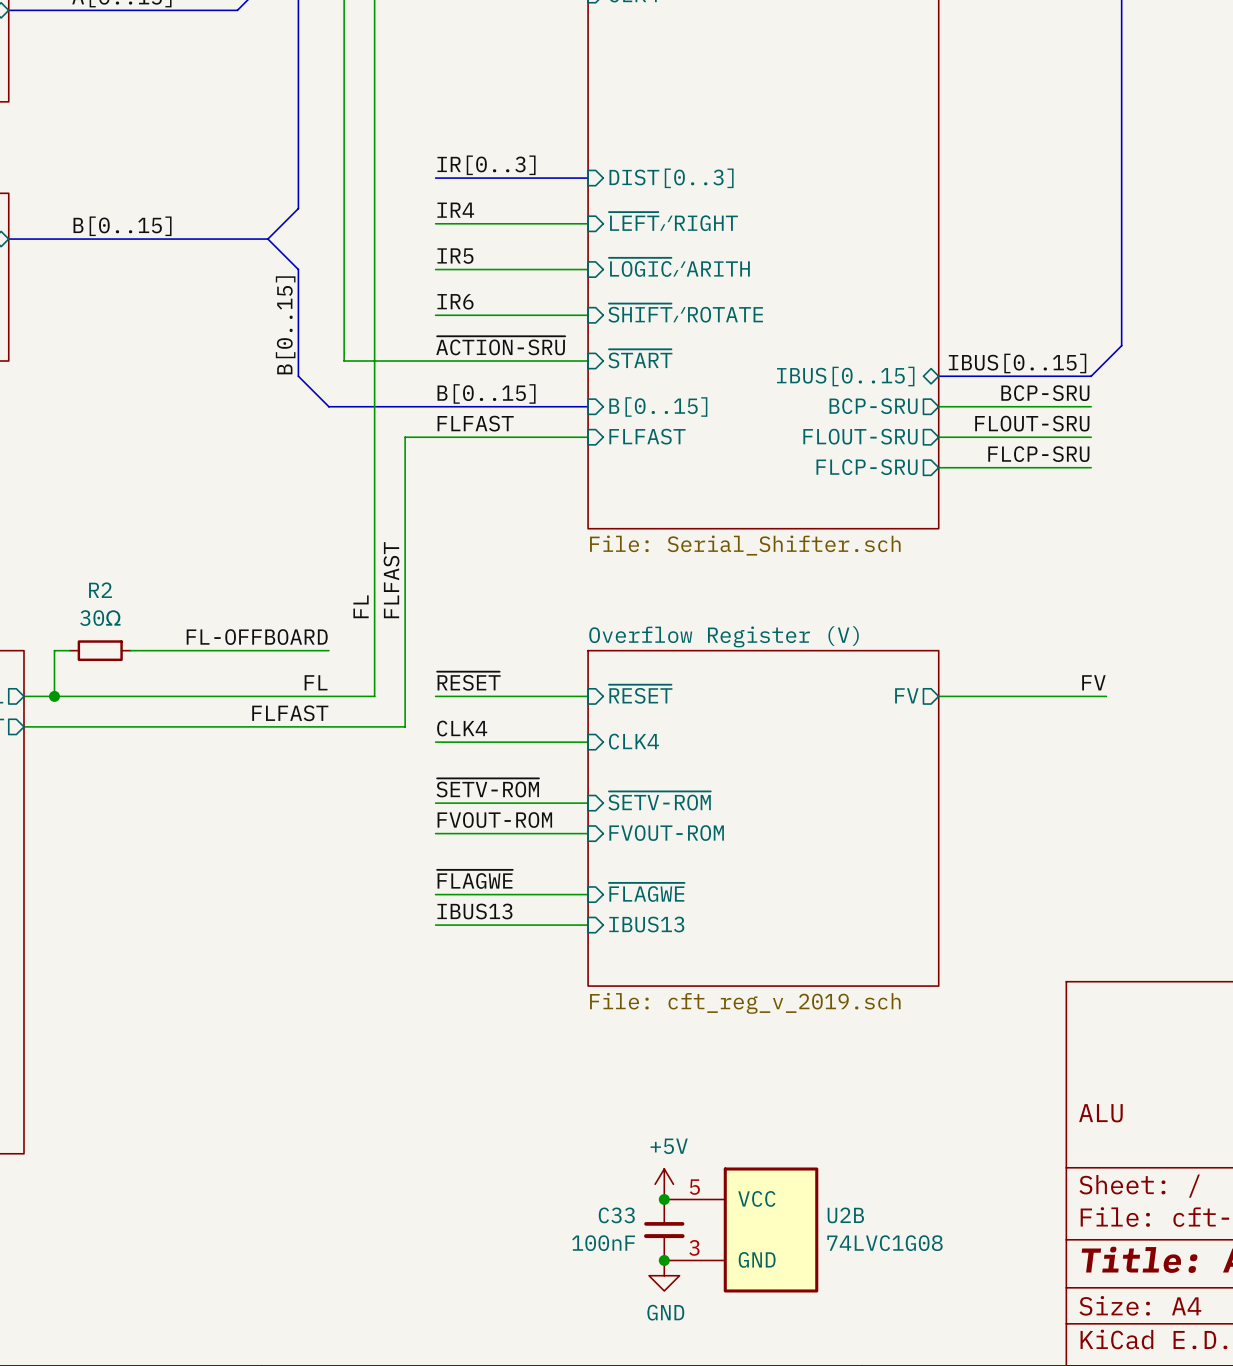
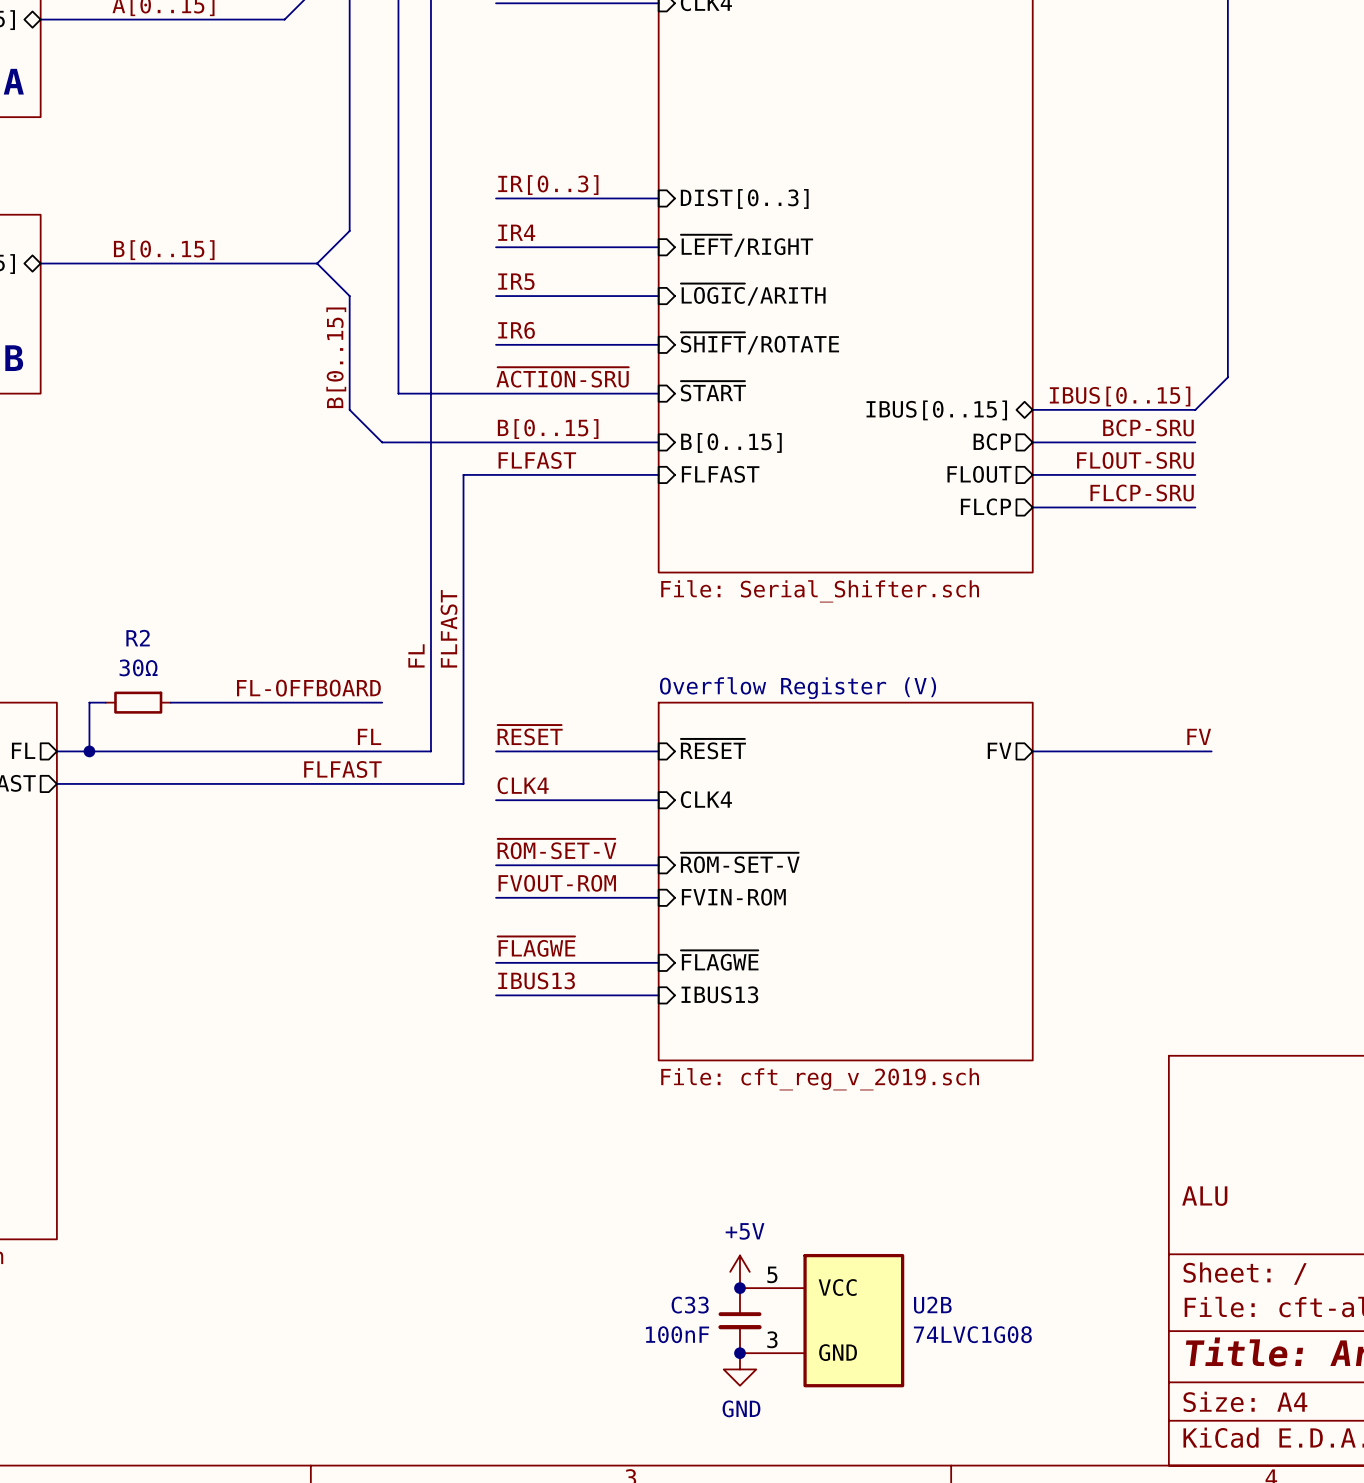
sheet pin: BCP-SRU (873, 406) -> BCP (992, 441)
sheet pin: FLOUT-SRU (860, 436) -> FLOUT (979, 474)
sheet pin: FLCP-SRU (867, 467) -> FLCP (985, 506)
label: ~{SETV-ROM} (487, 787) -> ~{ROM-SET-V} (556, 849)
sheet pin: ~{SETV-ROM} (659, 800) -> ~{ROM-SET-V} (740, 862)
sheet pin: FVOUT-ROM (666, 833) -> FVIN-ROM (733, 897)

